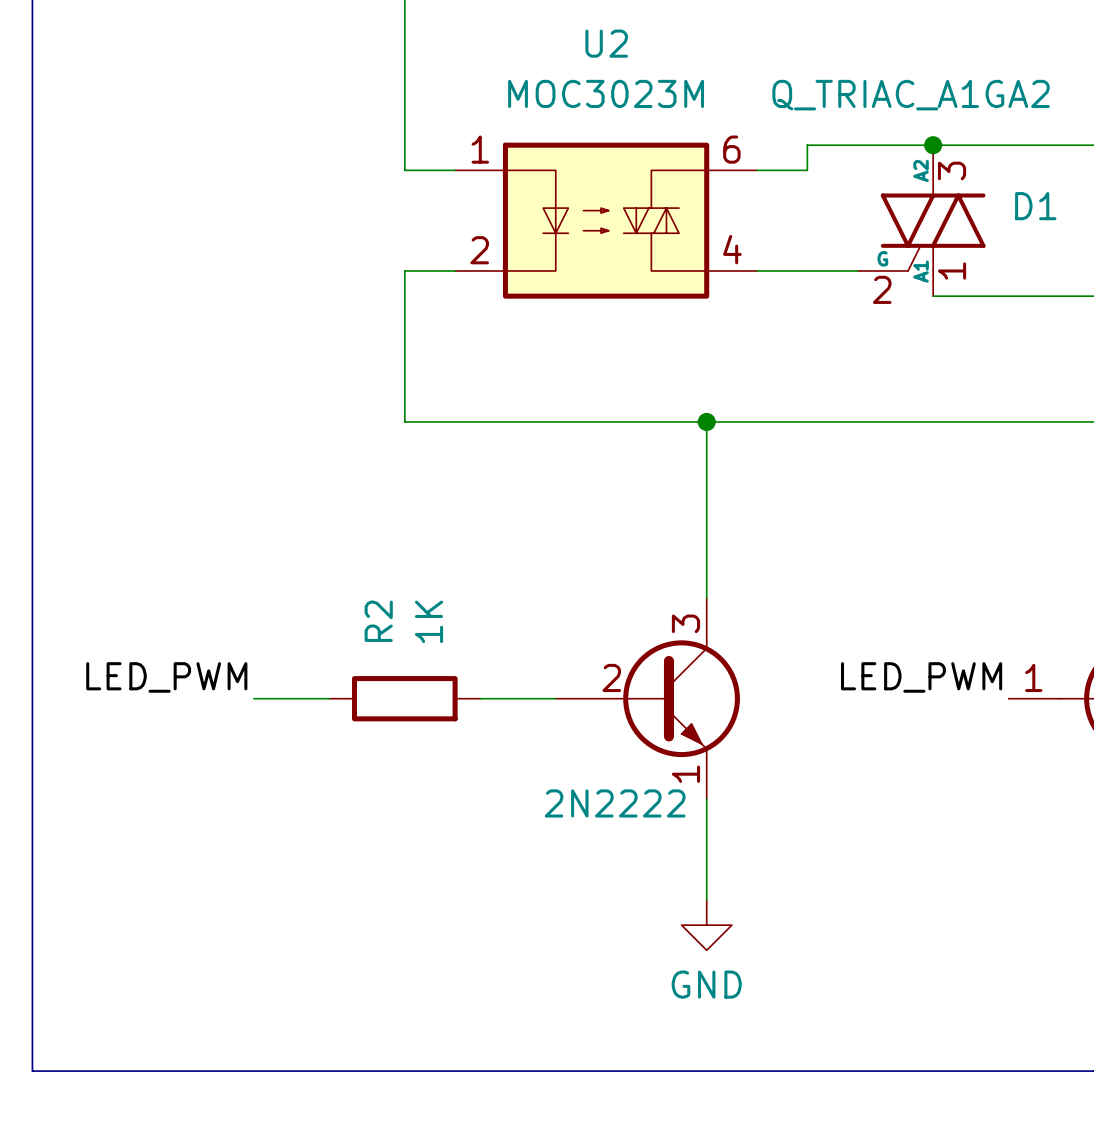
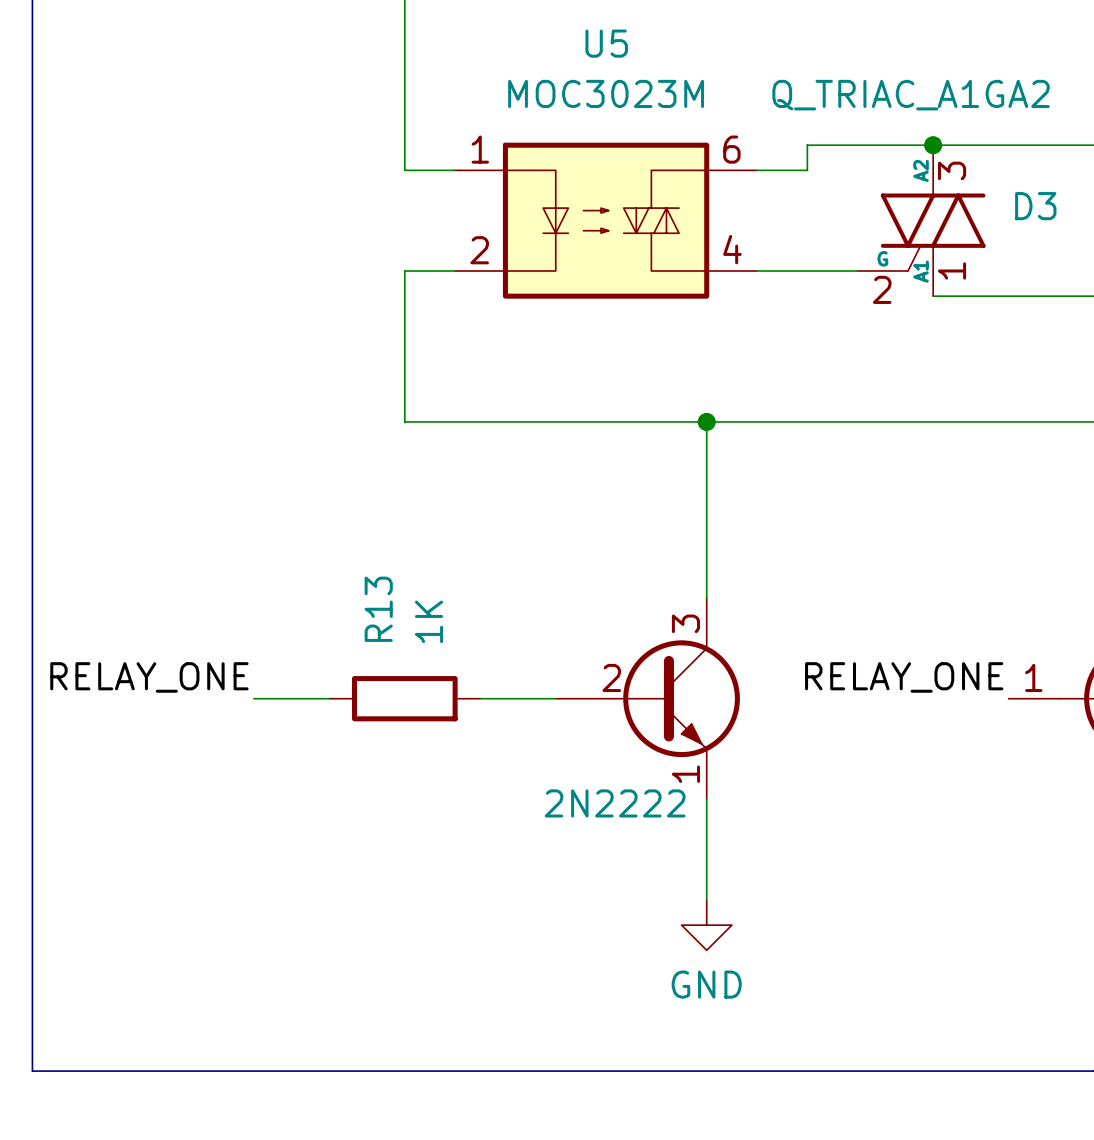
U2 name: U2 (606, 43) -> U5 (606, 43)
D1 name: D1 (1035, 206) -> D3 (1035, 206)
R2 name: R2 (378, 621) -> R13 (378, 609)
label: LED_PWM (166, 677) -> RELAY_ONE (149, 677)
label: LED_PWM (921, 677) -> RELAY_ONE (904, 677)

